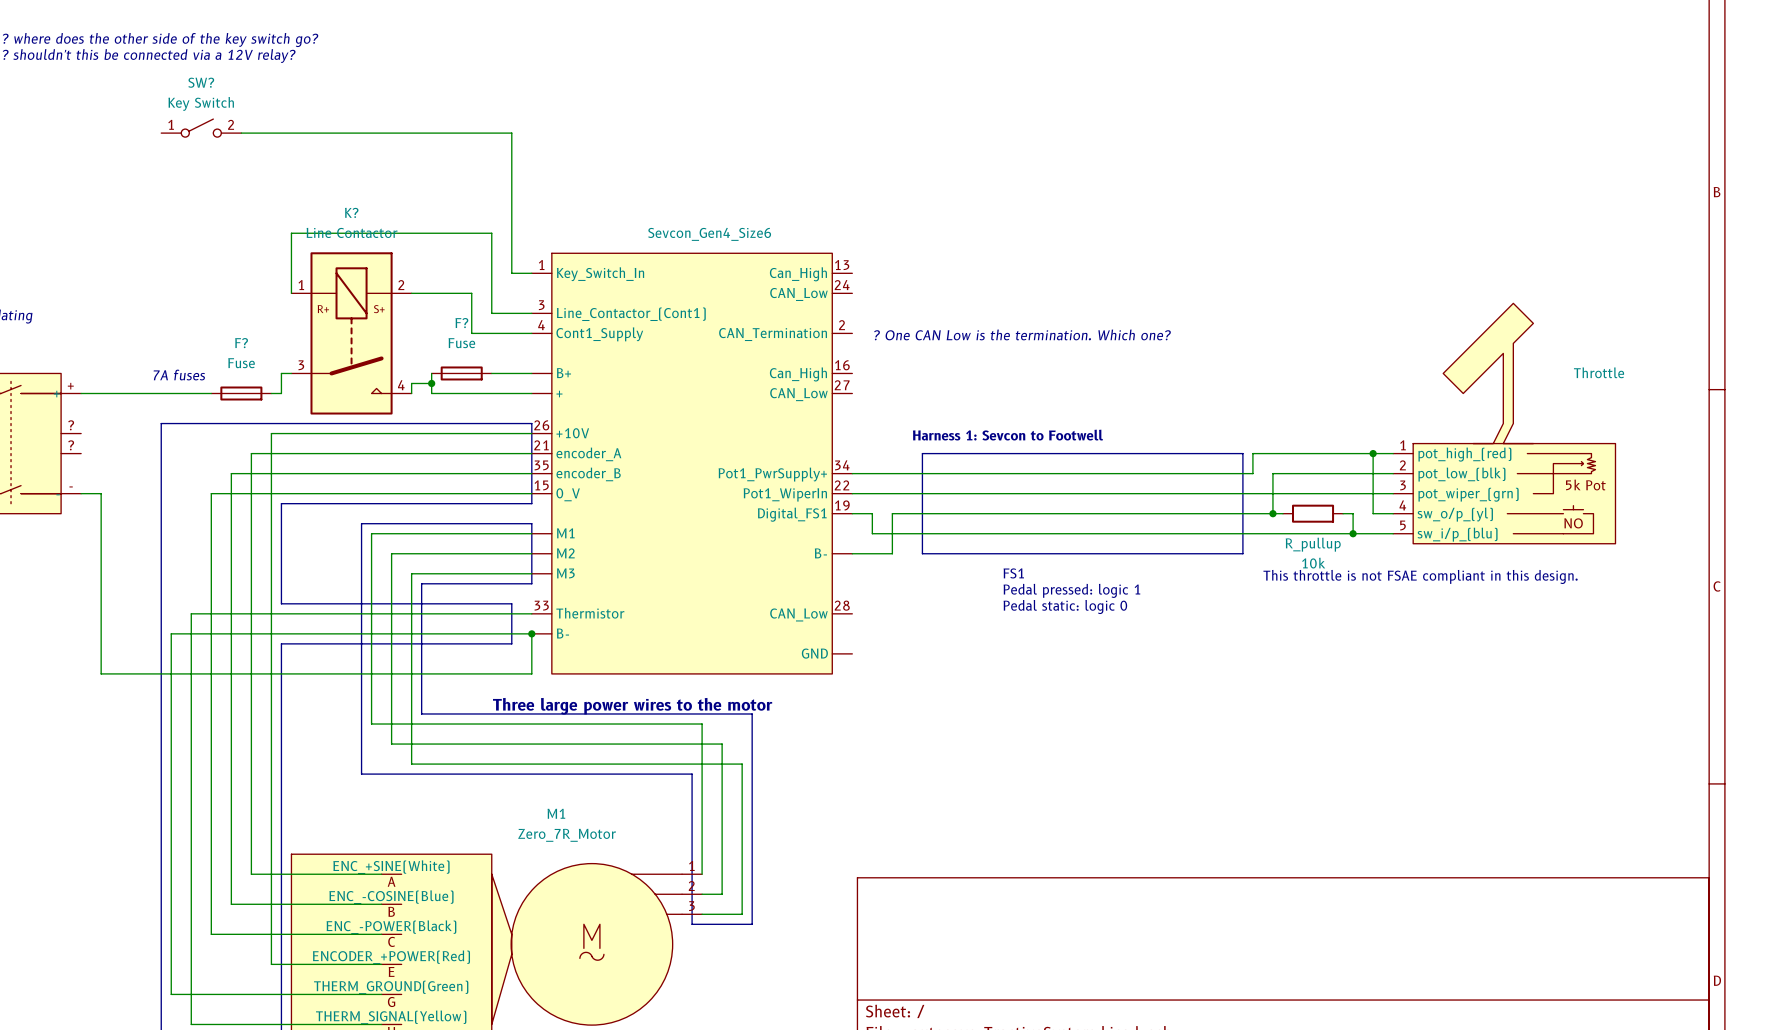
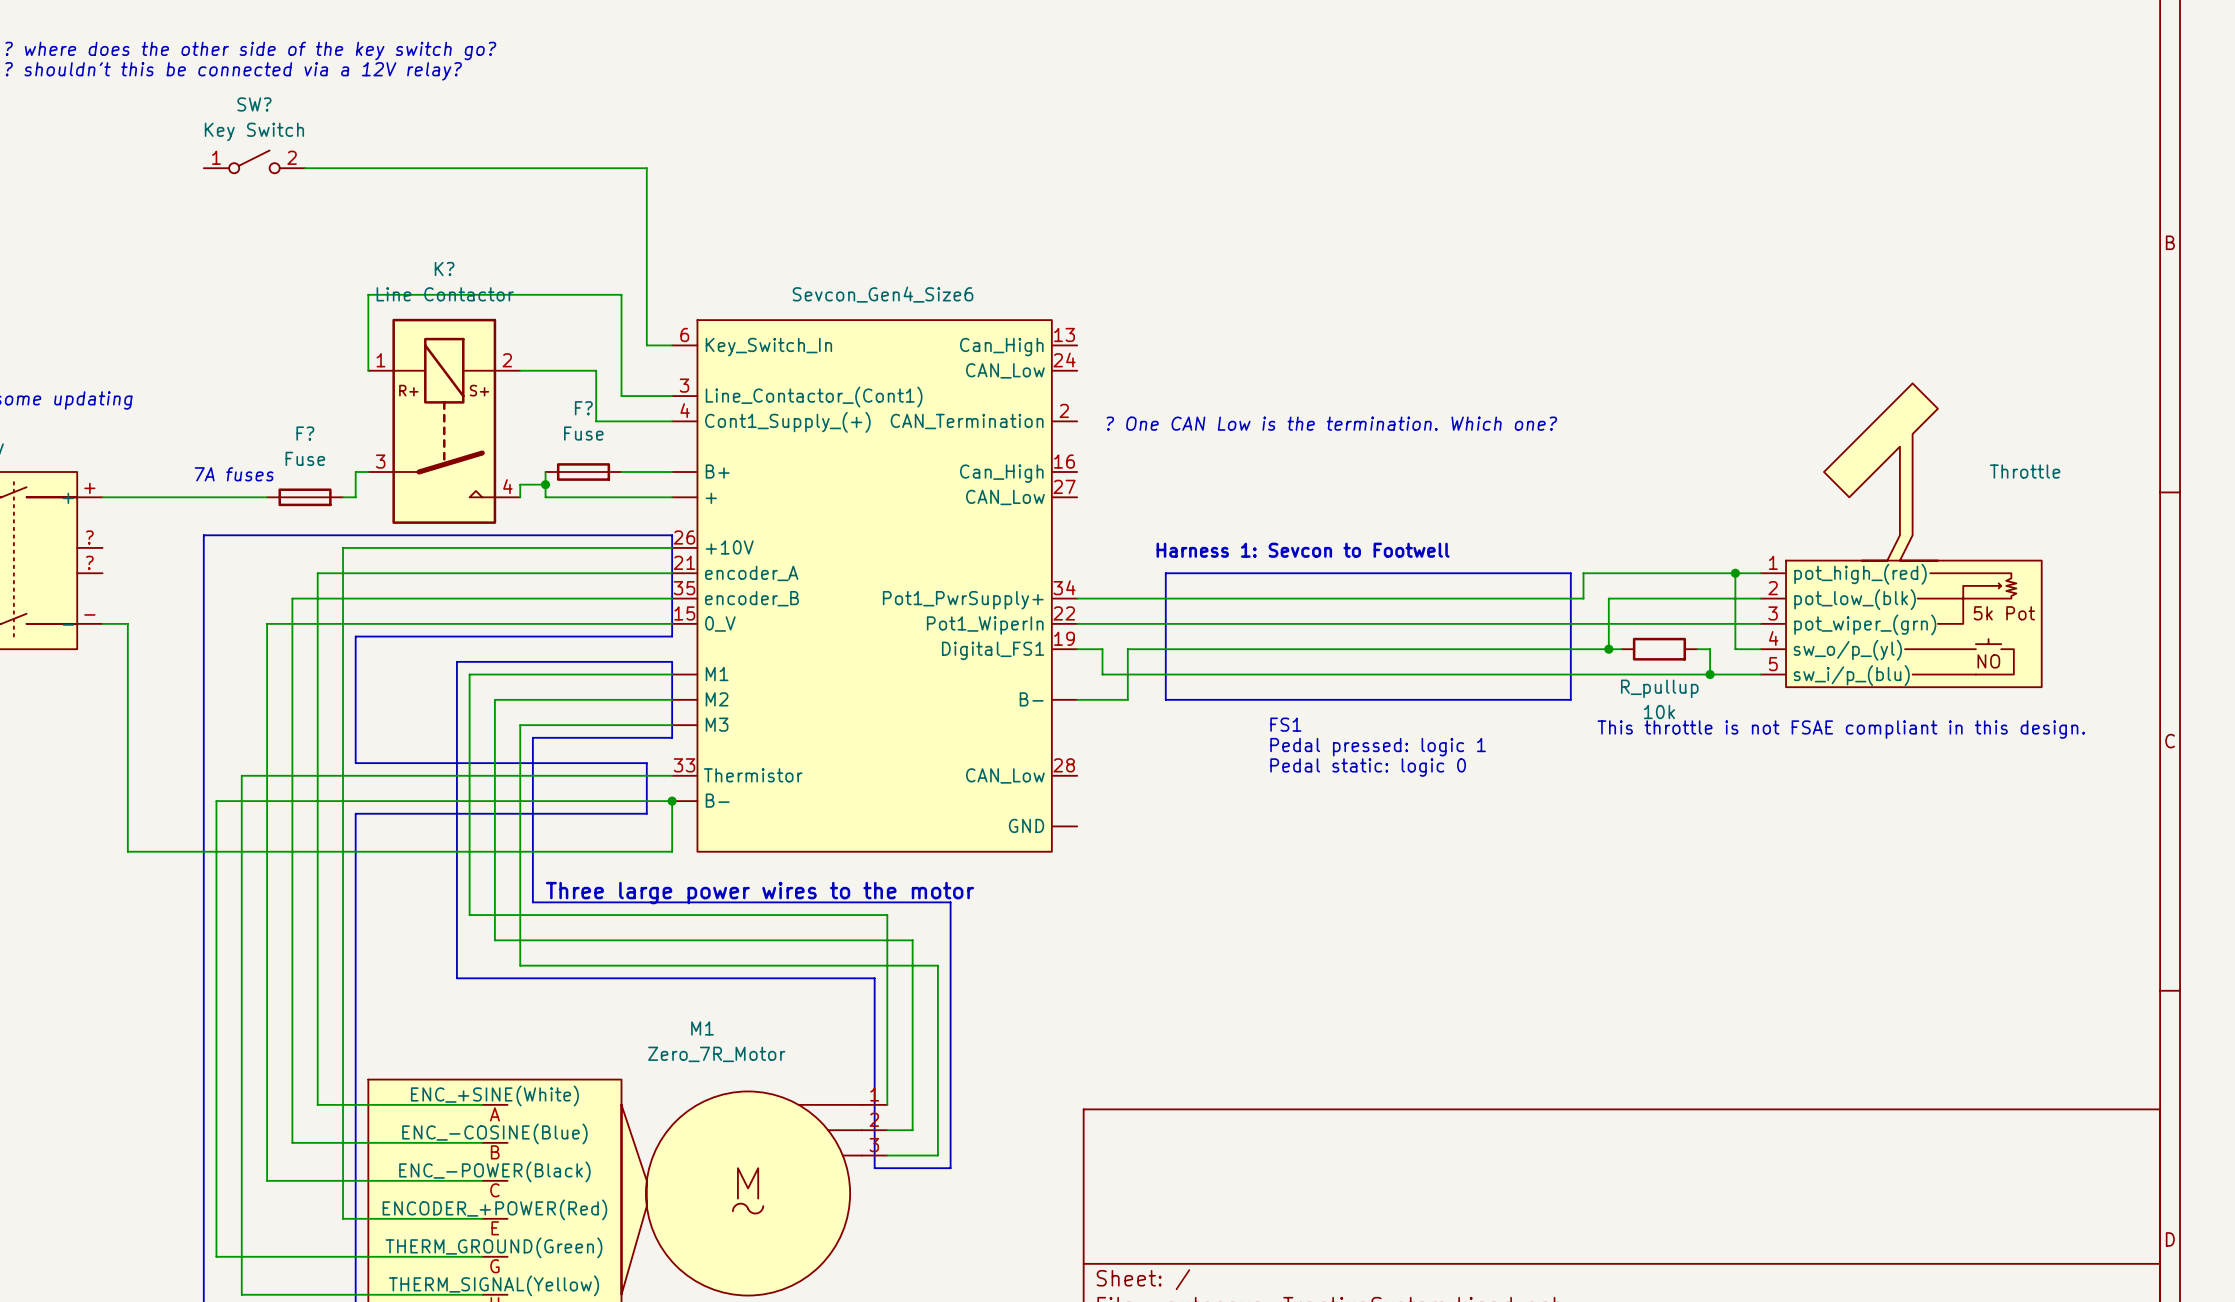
part pin number: 1 (541, 265) -> 6 (684, 334)
part pin name: Cont1_Supply (599, 334) -> Cont1_Supply_(+) (787, 422)

